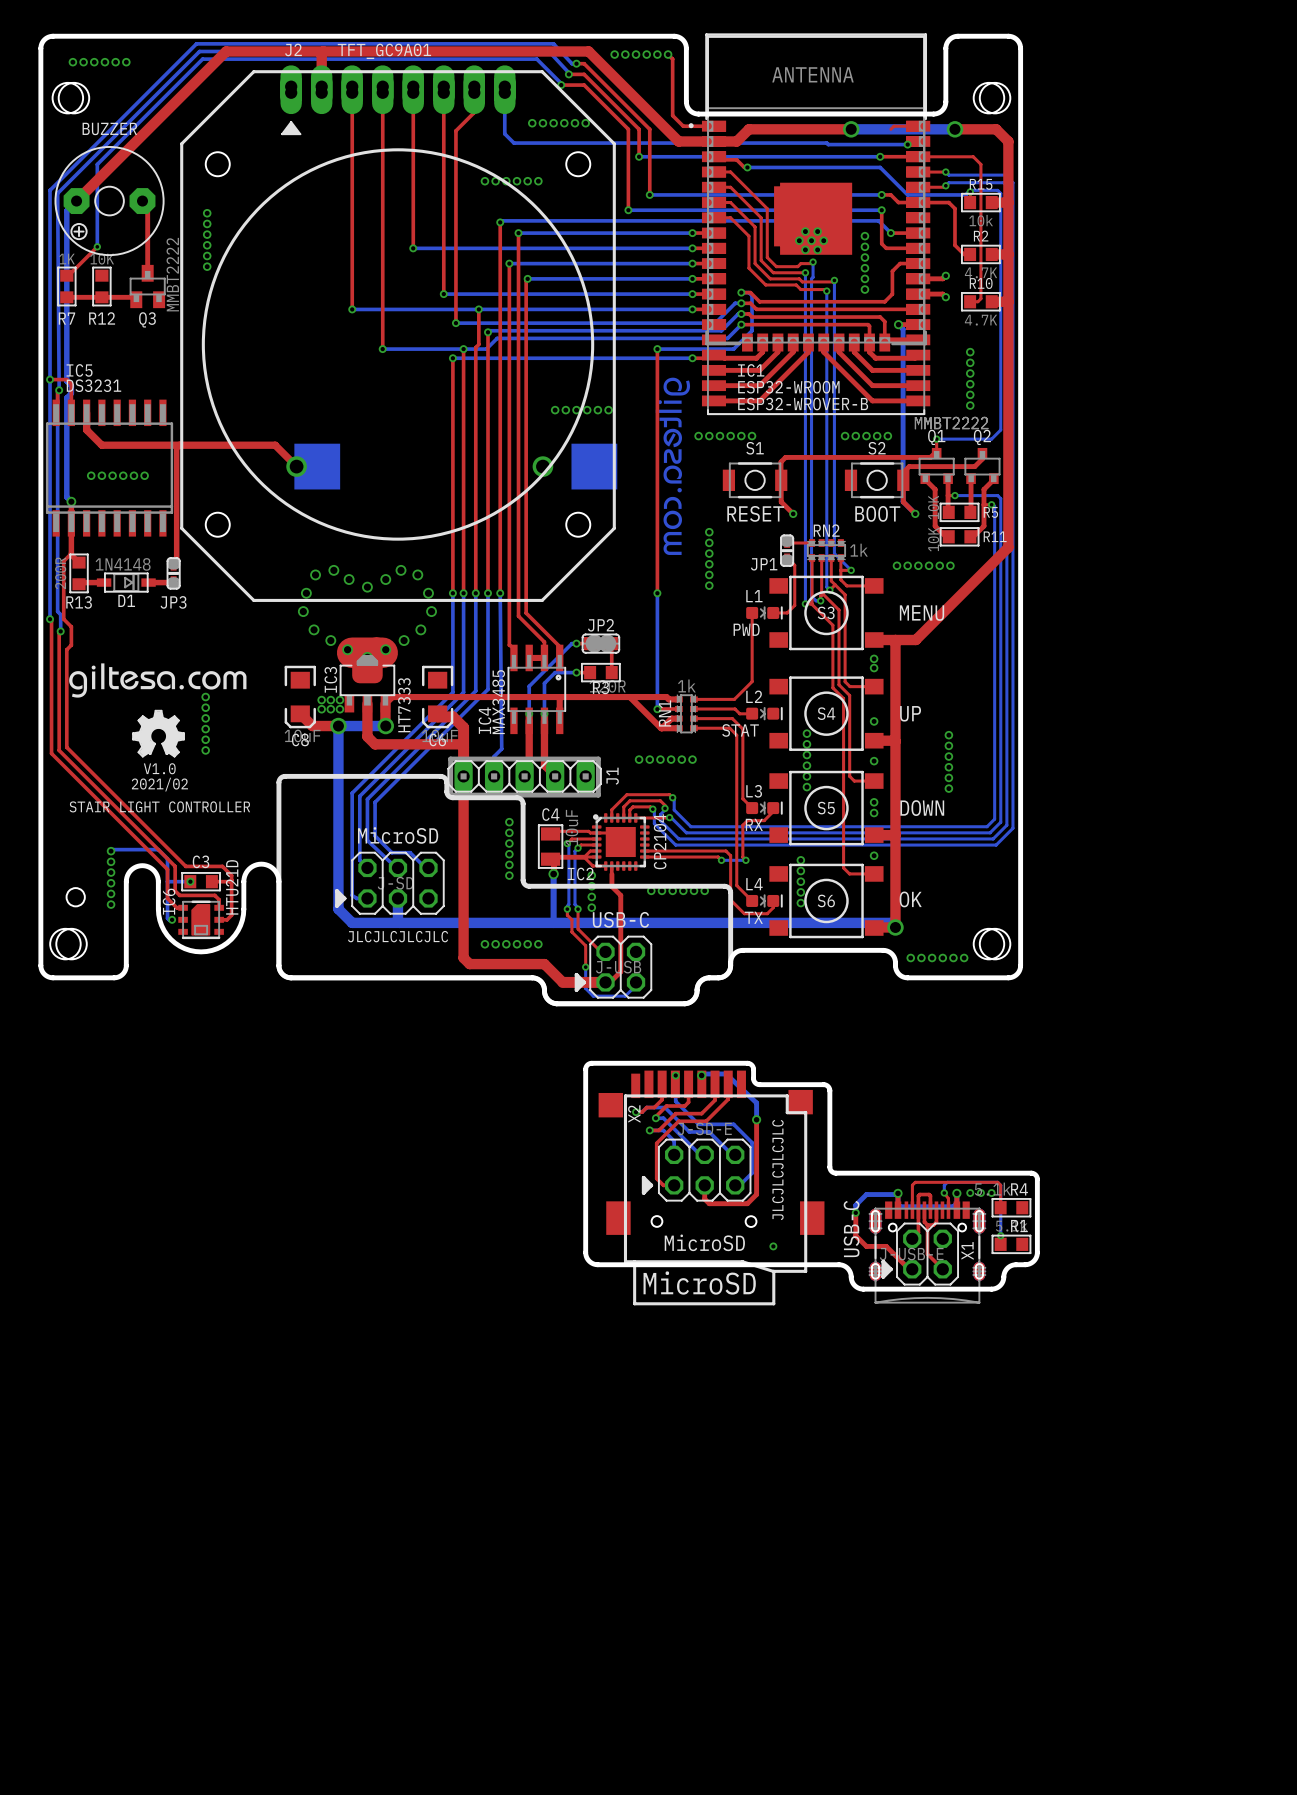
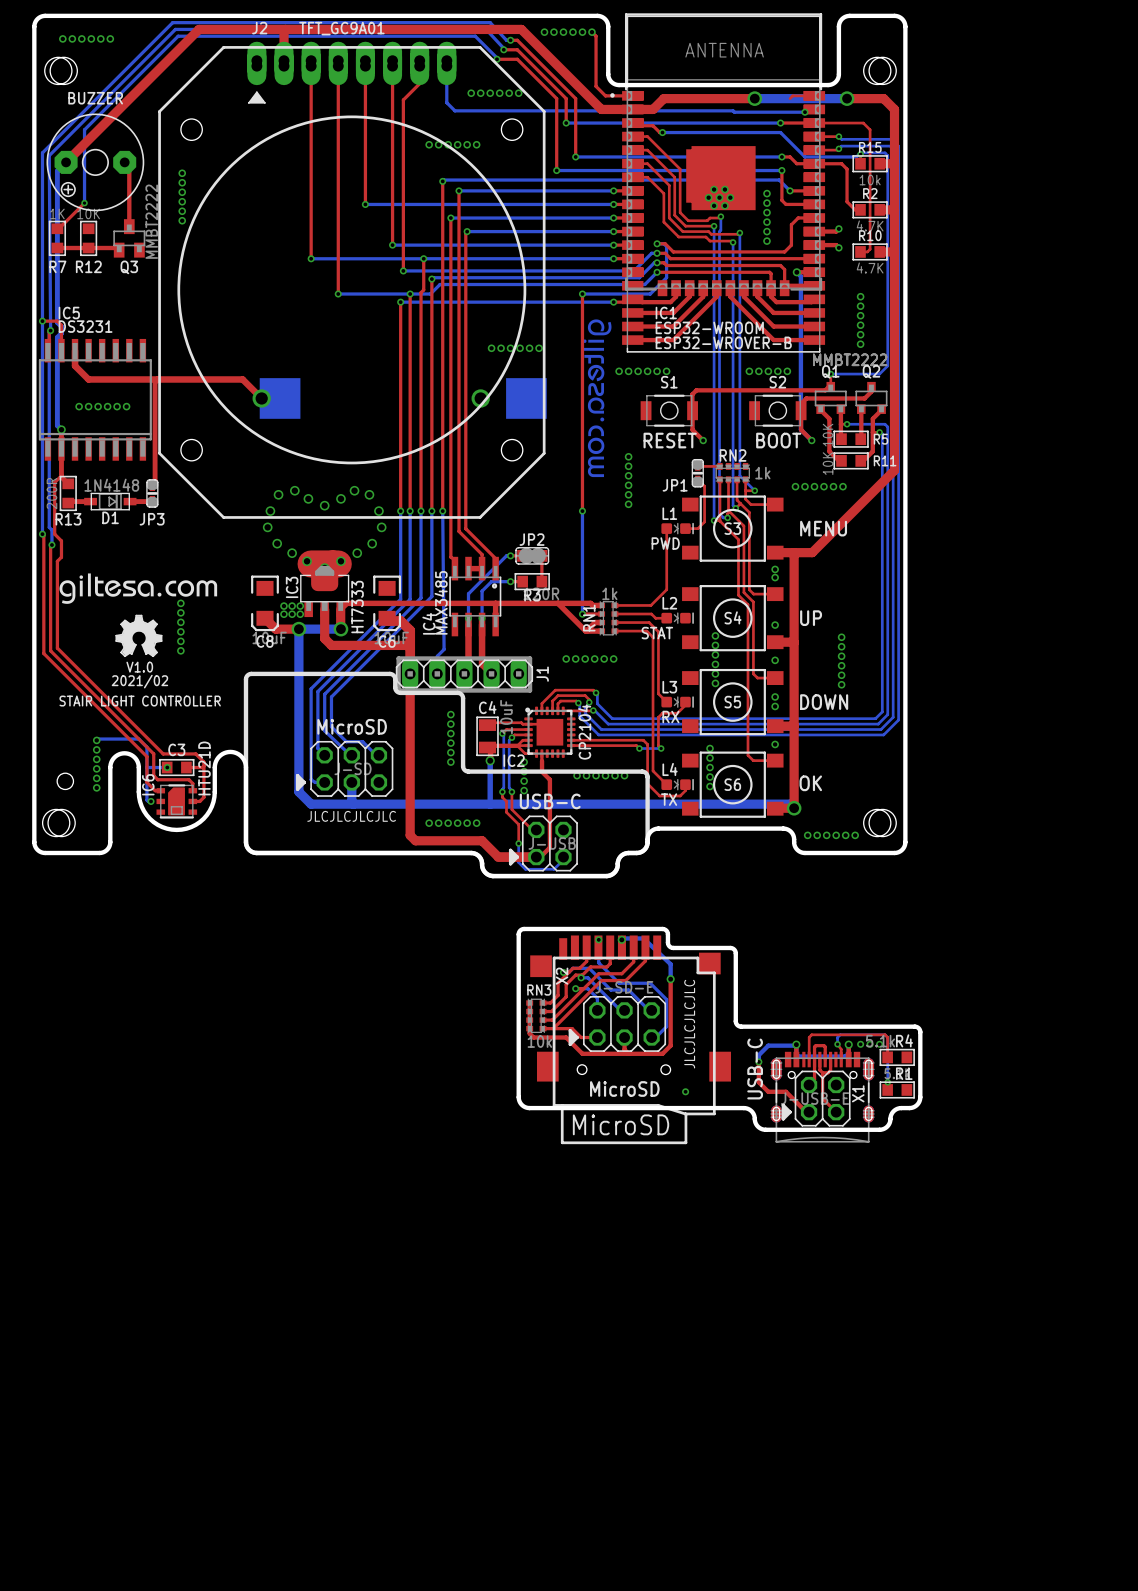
top track: none -> (568, 972) (558, 983) (558, 995) (550, 1002) (543, 1002)
top track: none -> (582, 975) (575, 975) (566, 984) (566, 996) (551, 1011) (543, 1011)
top track: none -> (583, 988) (552, 1020) (543, 1020)
top track: (656, 1143) (656, 1178) (663, 1185) -> (581, 1000) (553, 1028)
top track: none -> (529, 1002) (529, 1033) (533, 1037) (566, 1037) (582, 1053) (628, 1053)
RN3: none -> 10k (536, 1015)
top track: none -> (543, 1028) (572, 1028) (581, 1037) (587, 1037)

